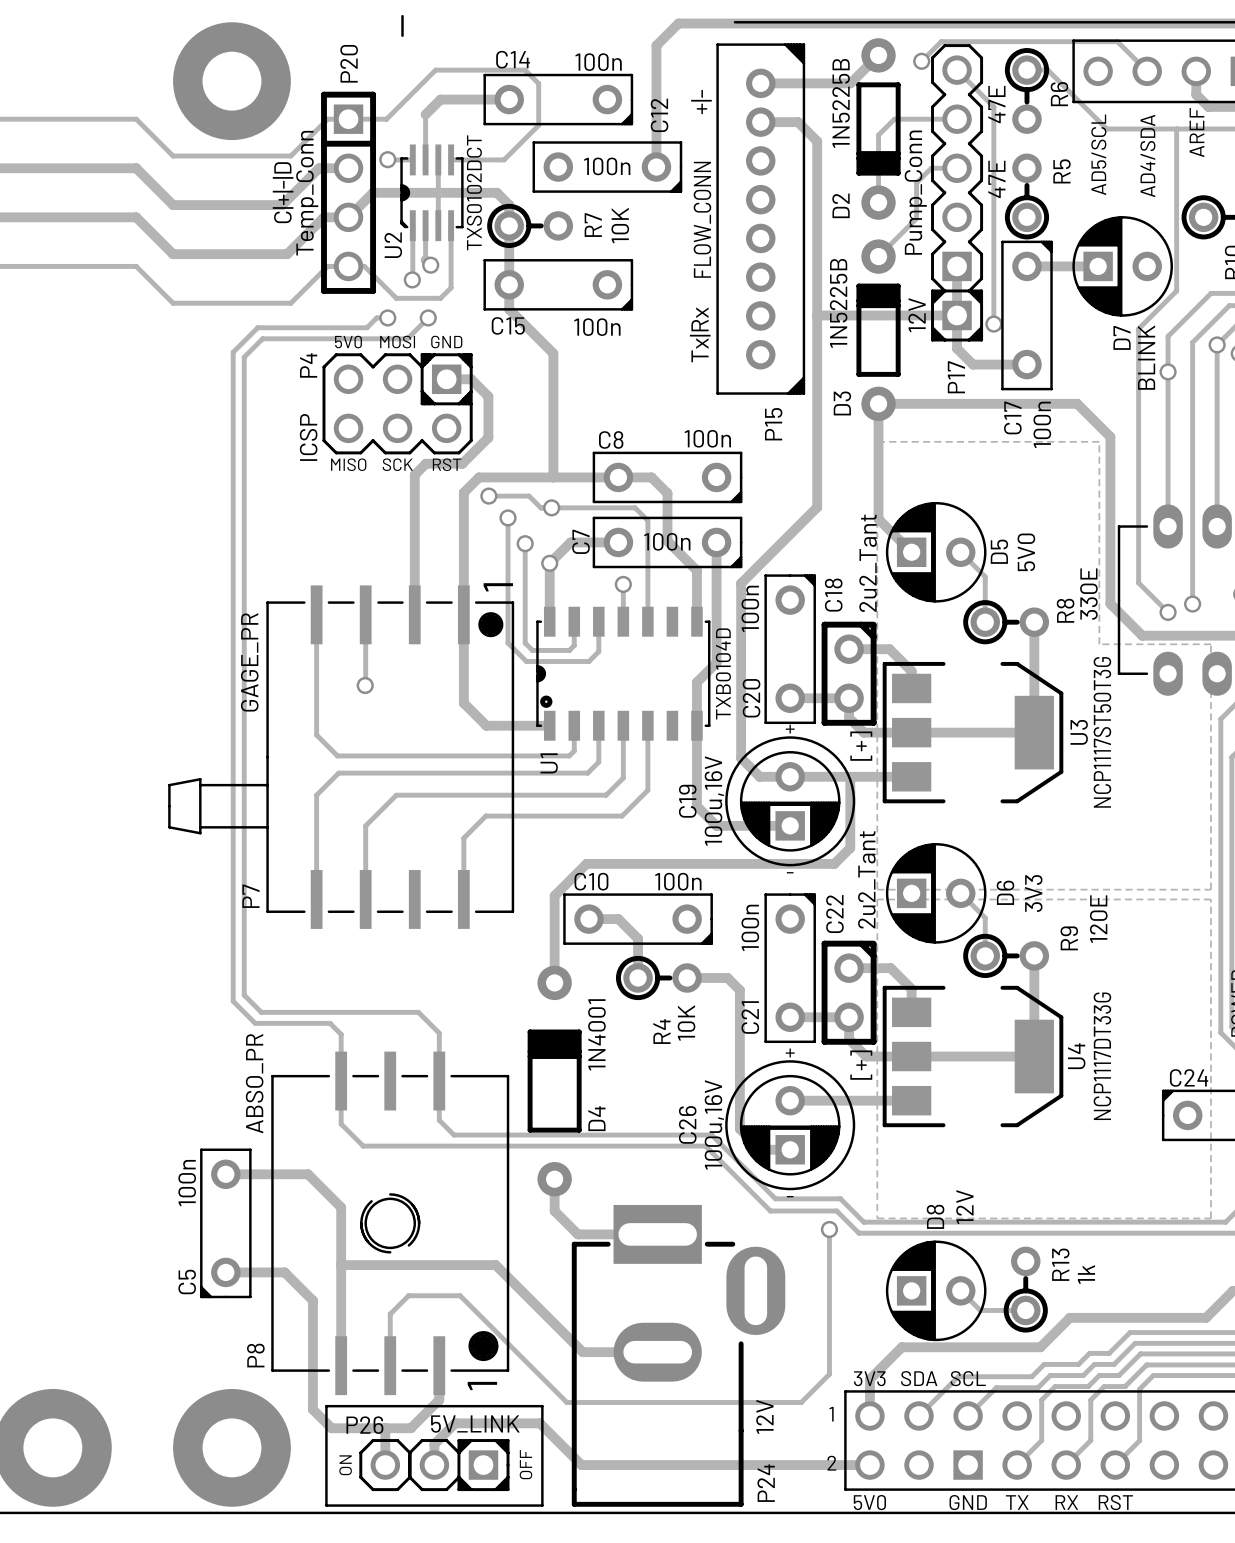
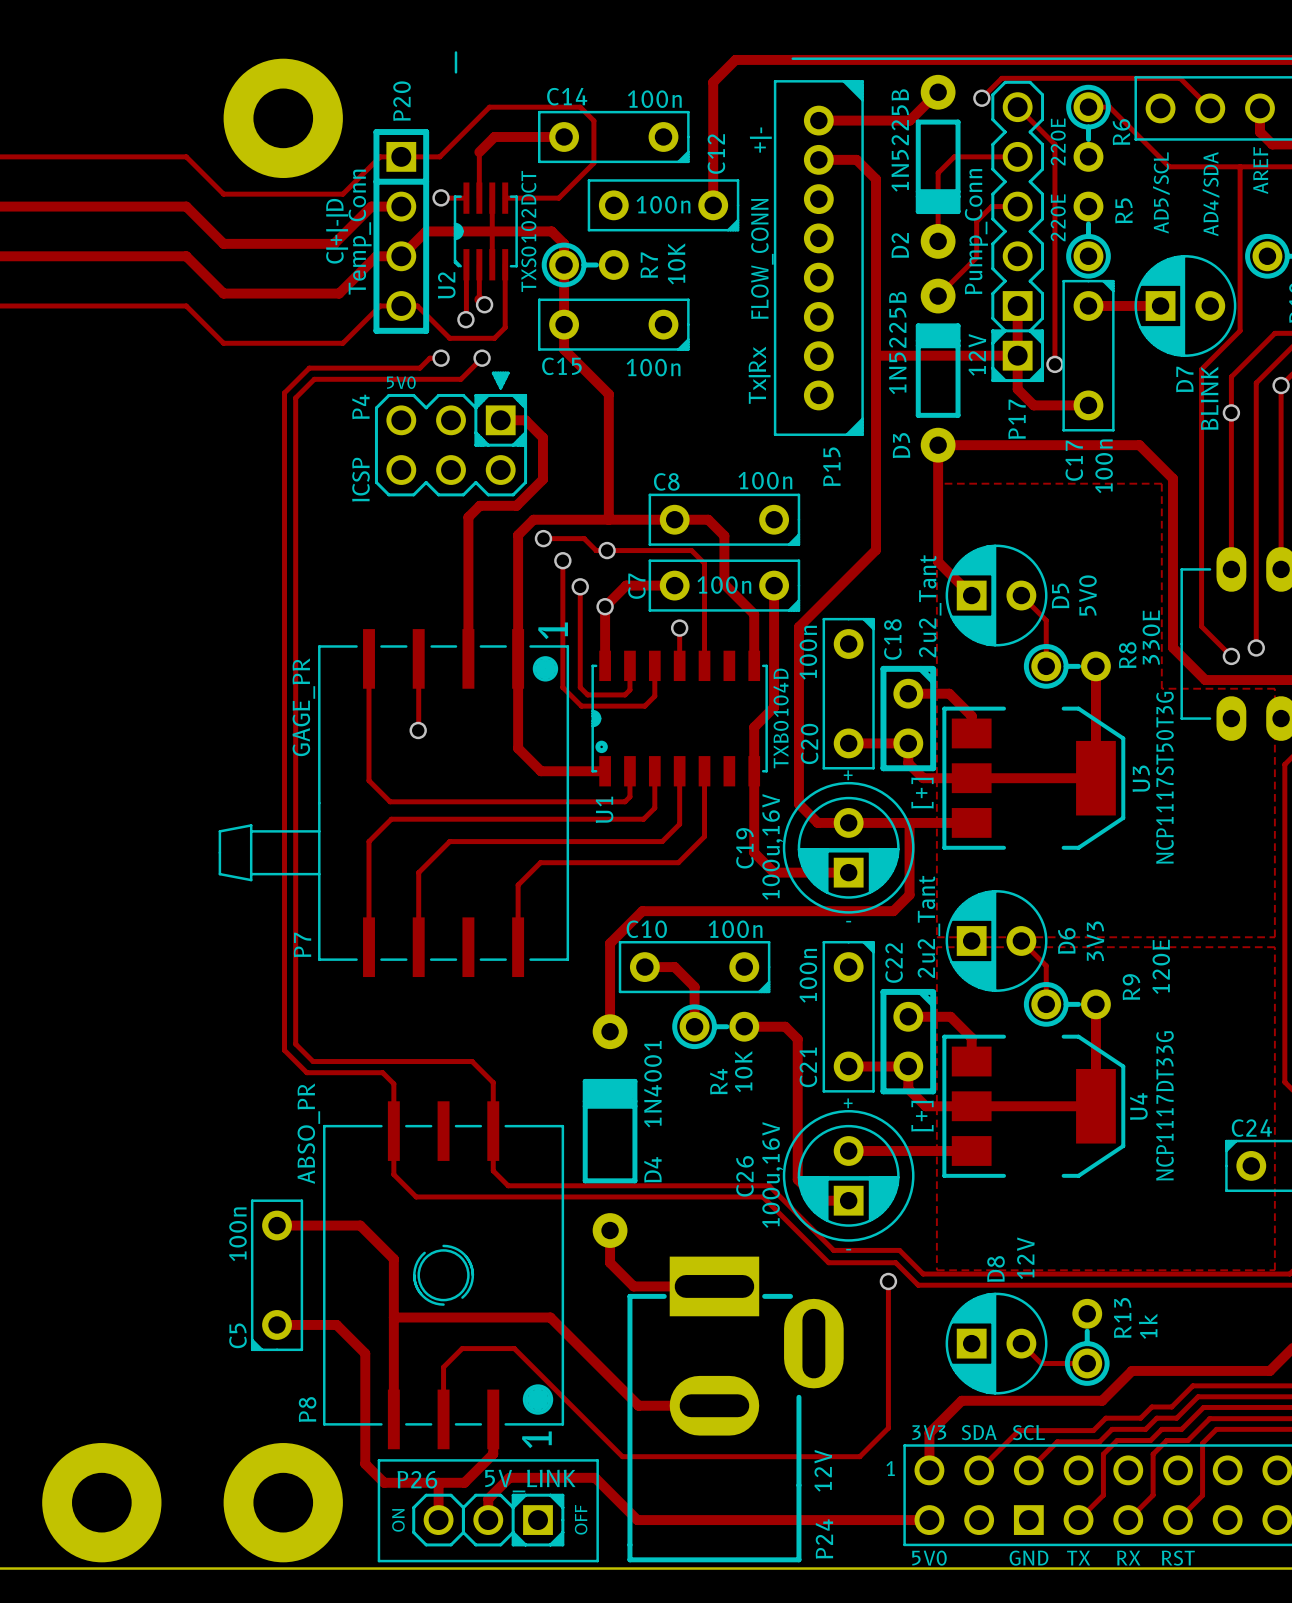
R6 value: 47E (996, 104) -> 220E (1058, 141)
R5 value: 47E (996, 179) -> 220E (1058, 217)
P4 footprint: [322, 353, 473, 455] -> [374, 371, 528, 497]
text: 2 (831, 1463) -> none

